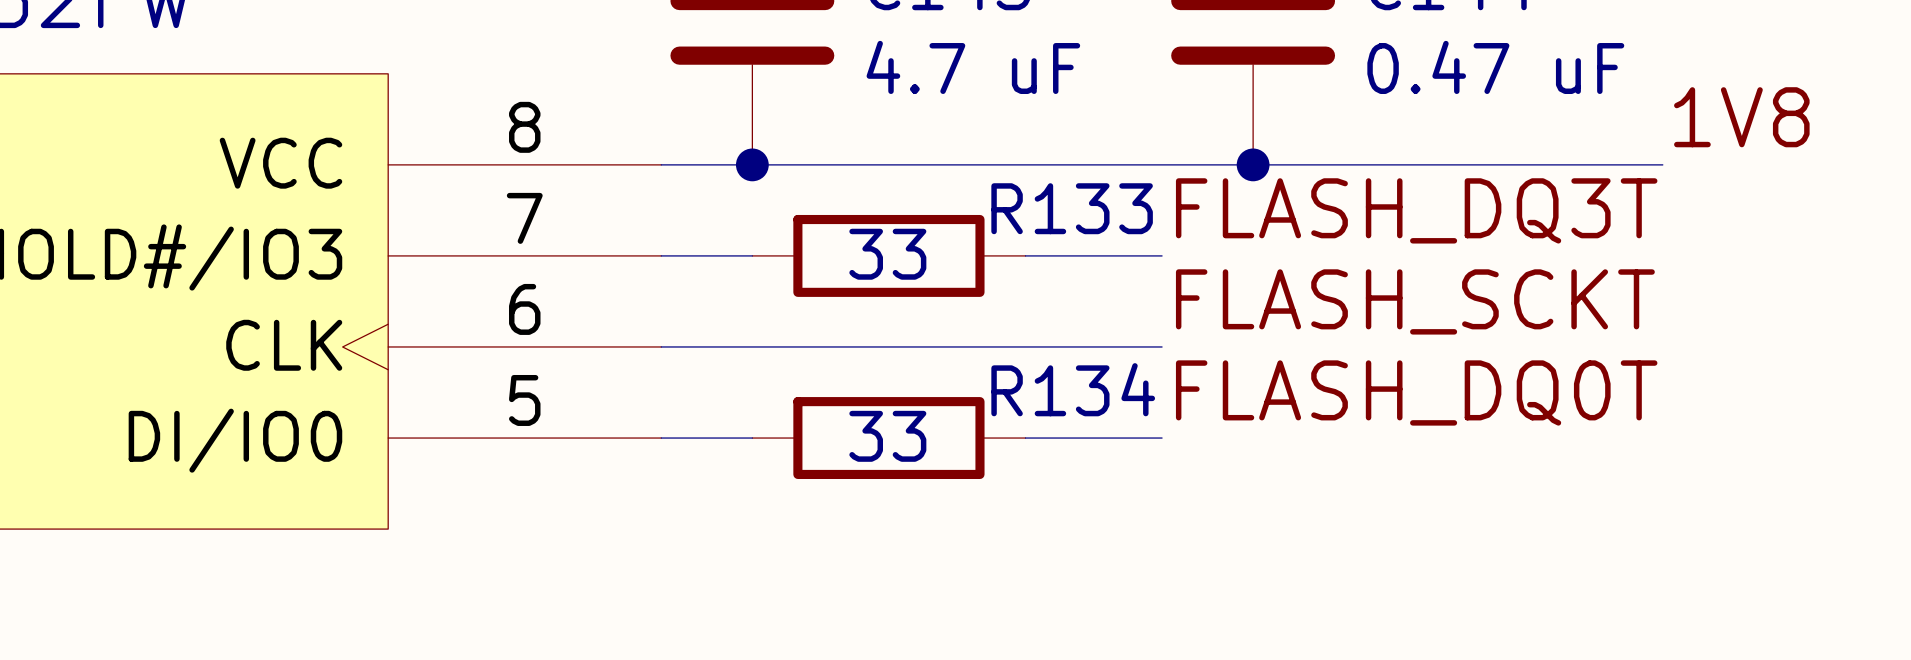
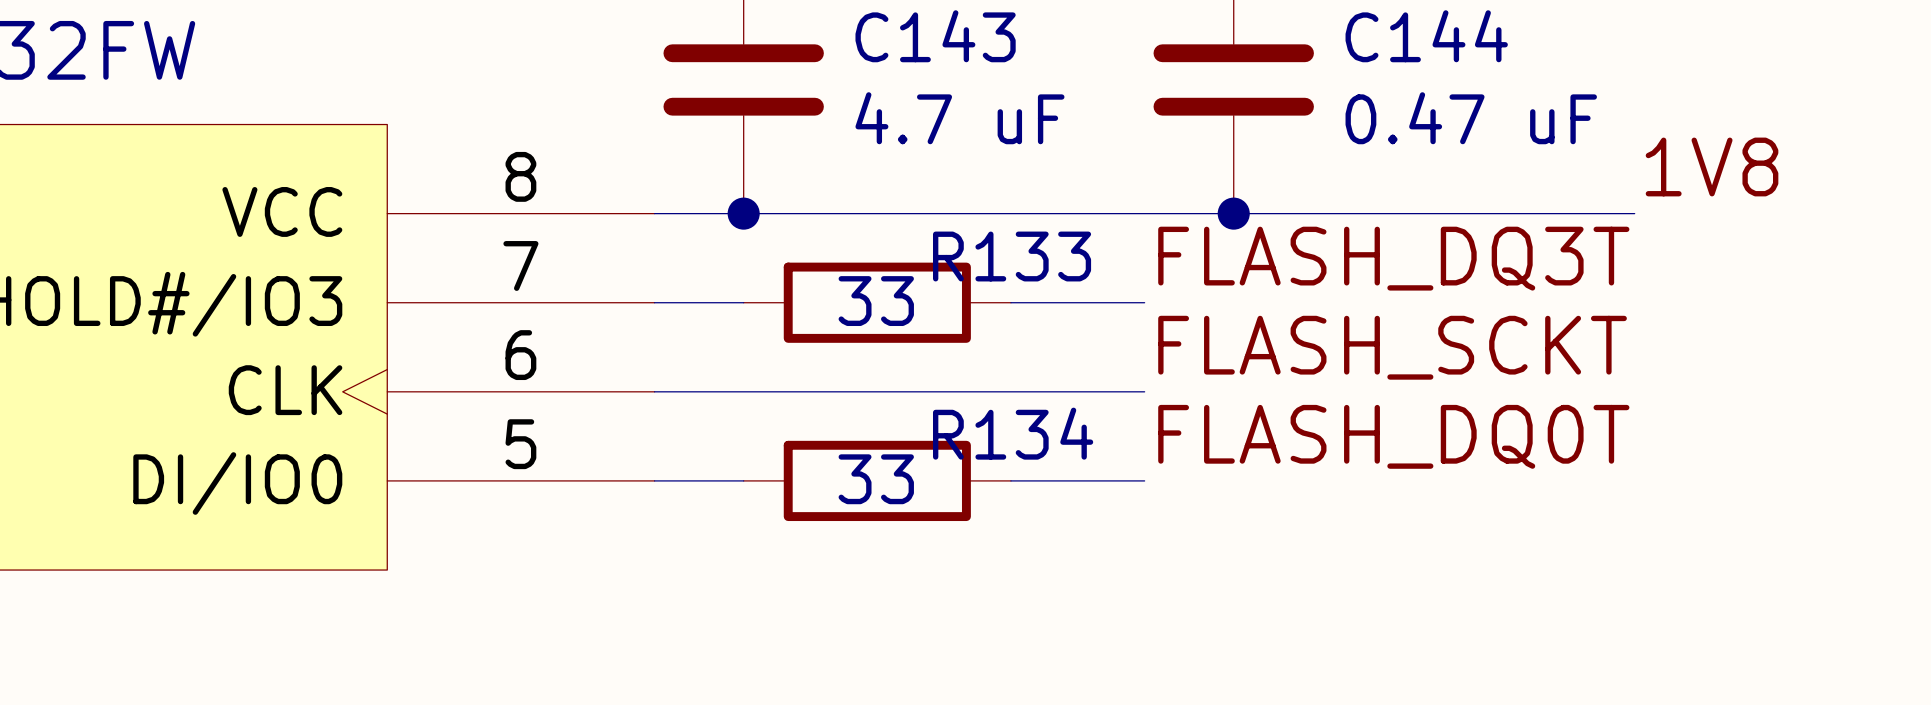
R133 name position: R133 (1072, 208) -> R133 (1012, 256)
R134 name position: R134 (1073, 389) -> R134 (1013, 433)

